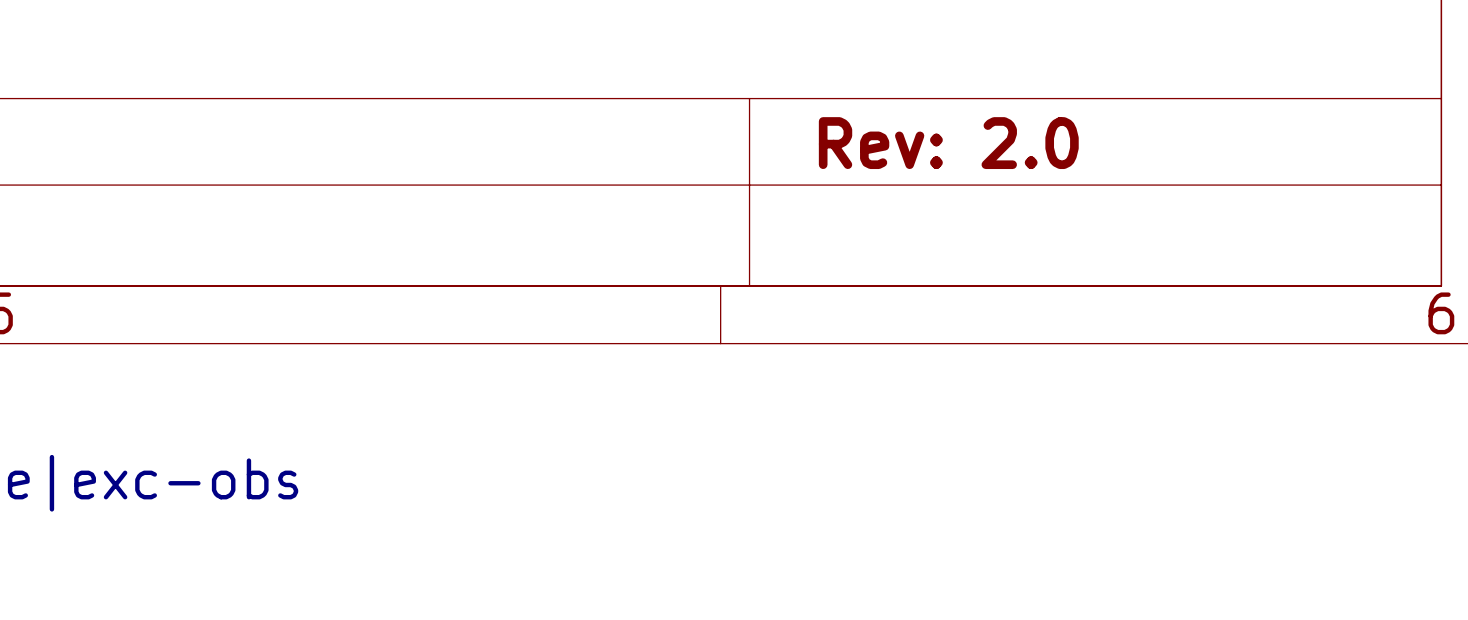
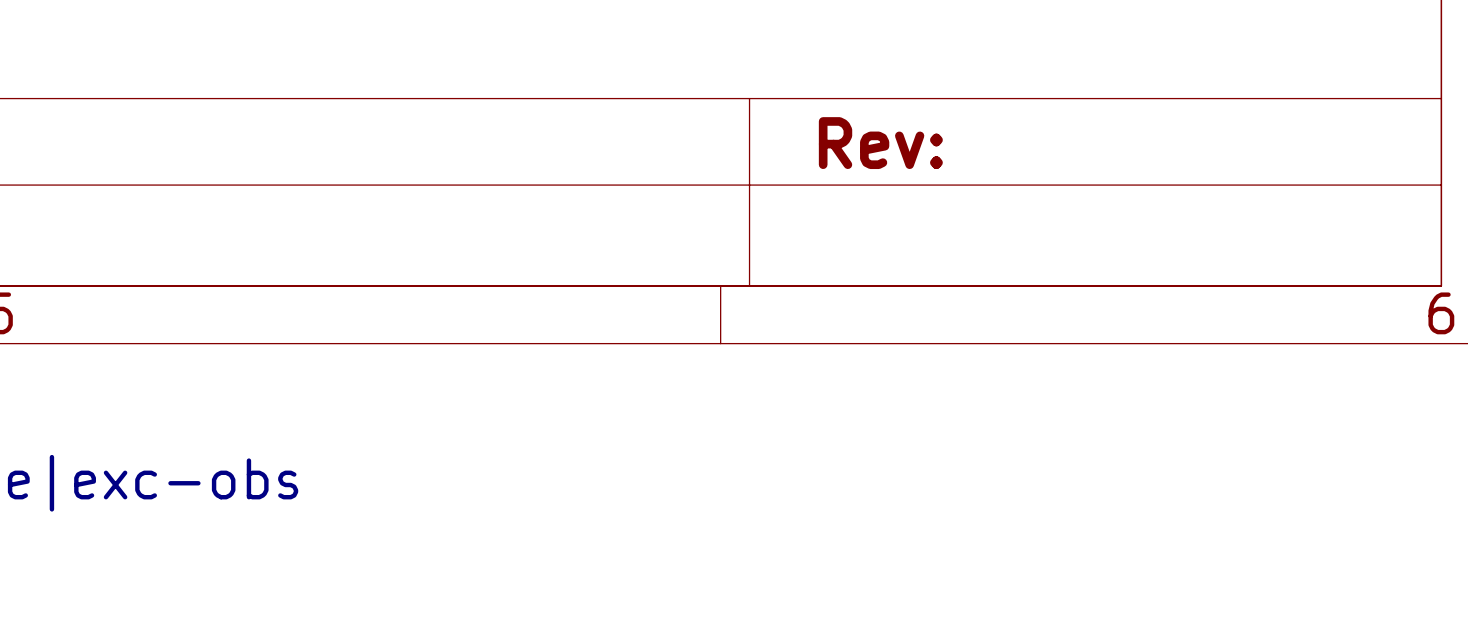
title block: Rev: 2.0 (948, 143) -> Rev: (880, 143)

